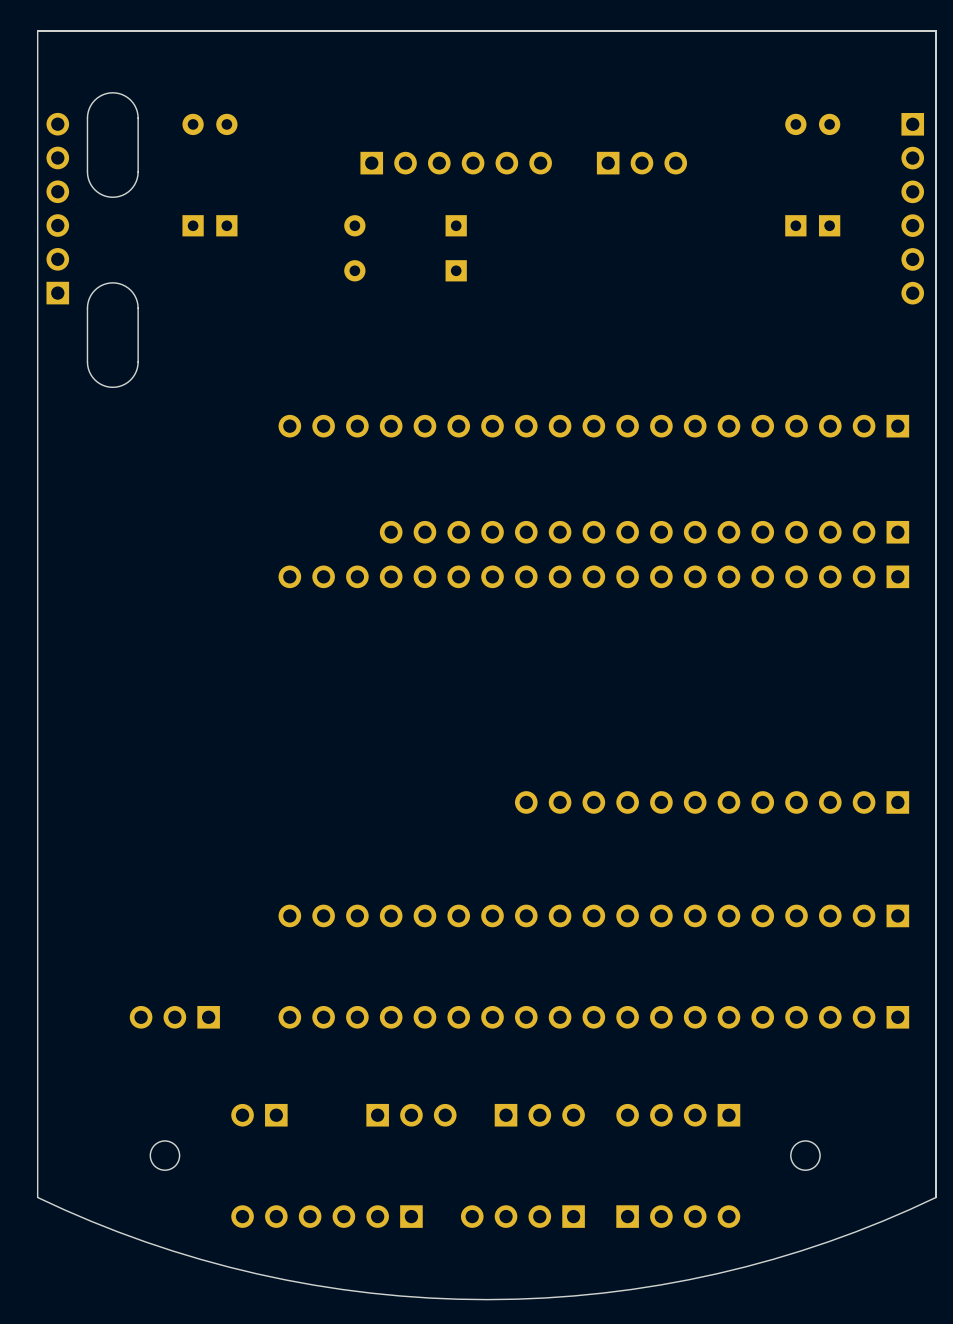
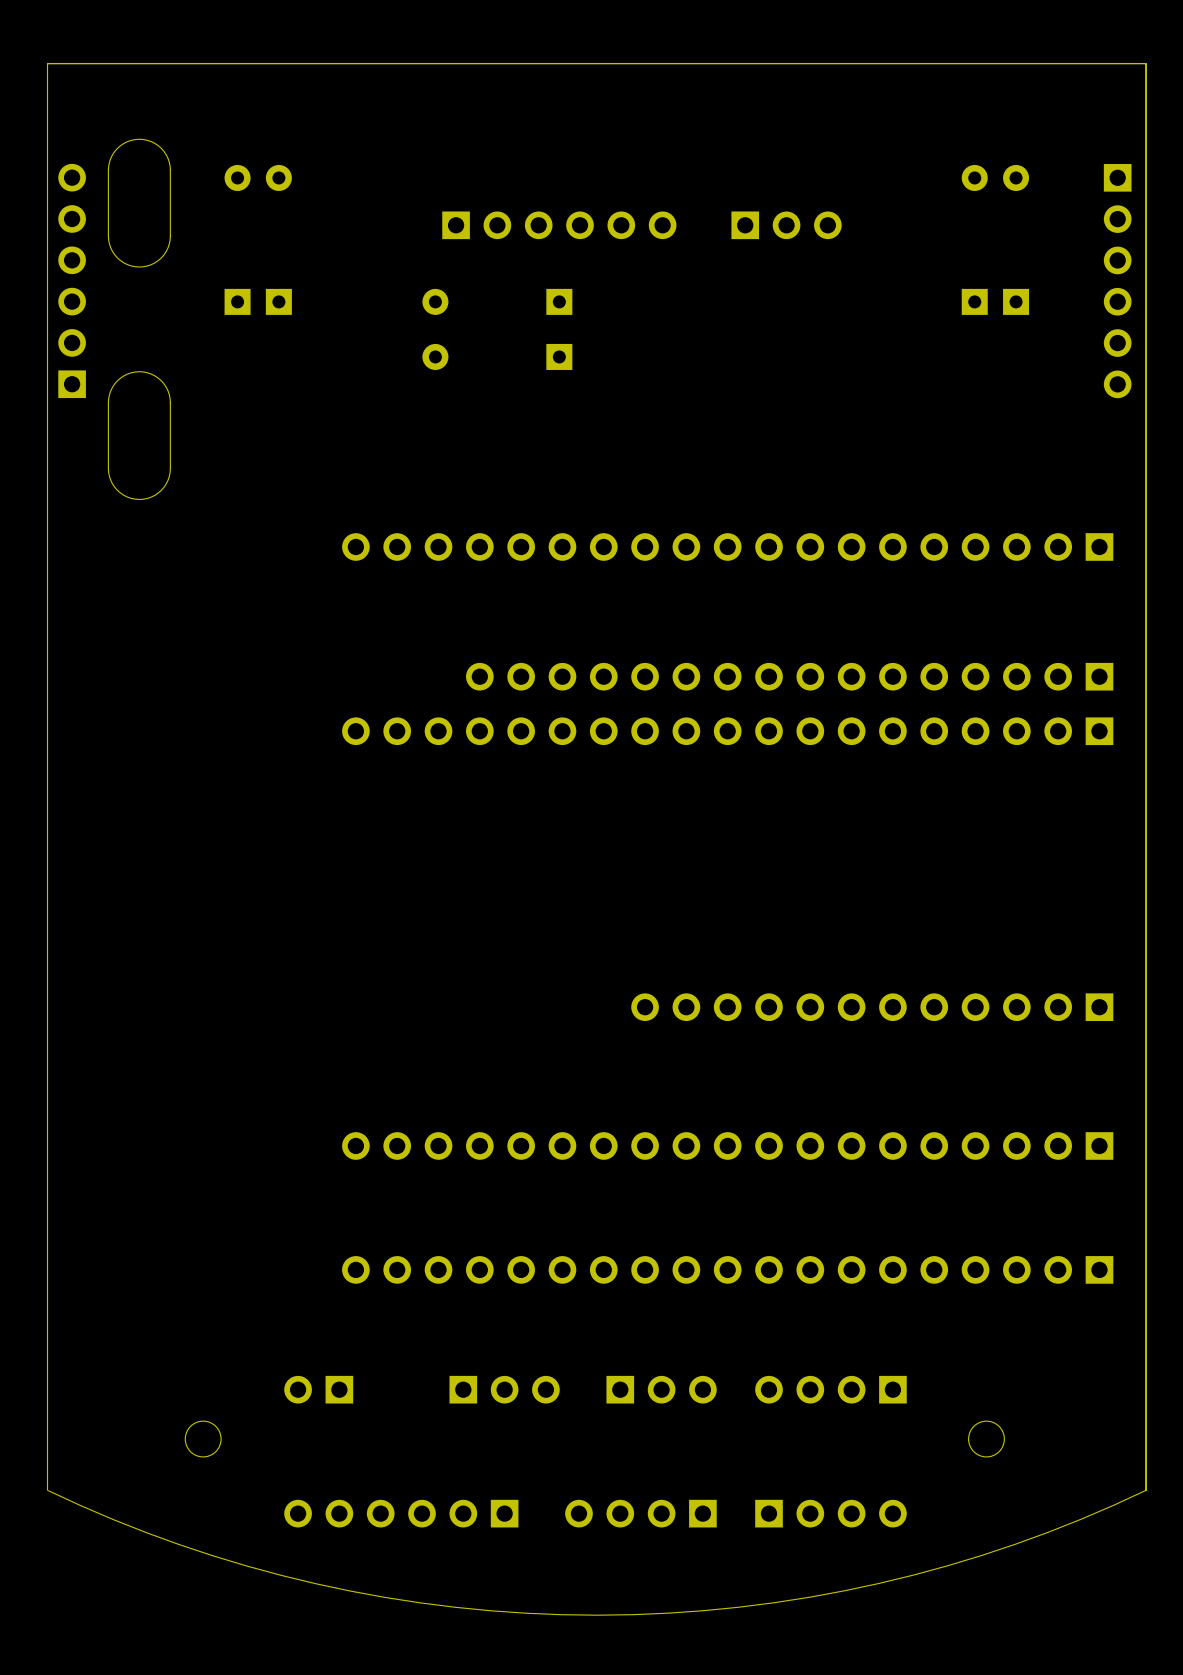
part: (174, 1017) -> none

